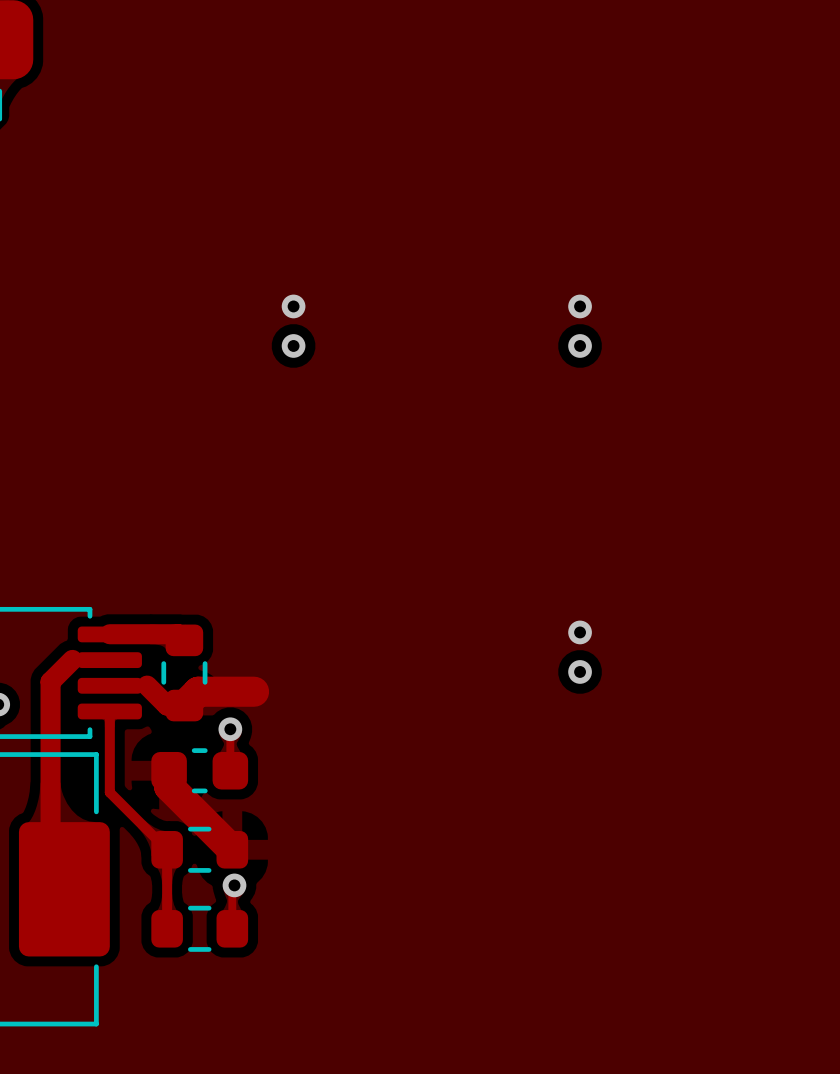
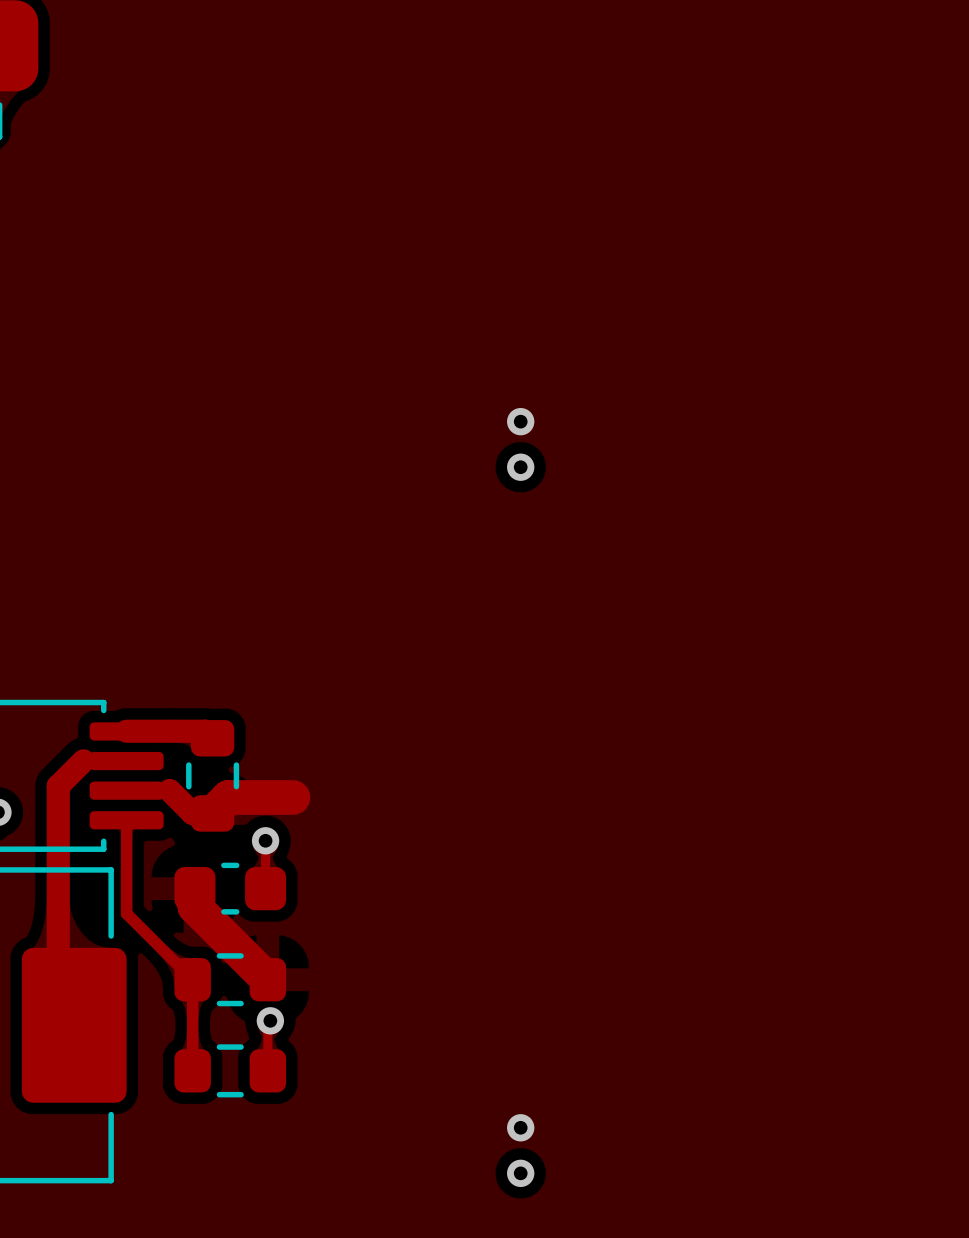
via: (293, 306) -> none
via: (580, 306) -> none
via: (293, 345) -> none
via: (580, 345) -> none
via: none -> (520, 421)
via: none -> (520, 467)
via: (580, 632) -> none
via: (580, 671) -> none
via: none -> (520, 1127)
via: none -> (520, 1173)

